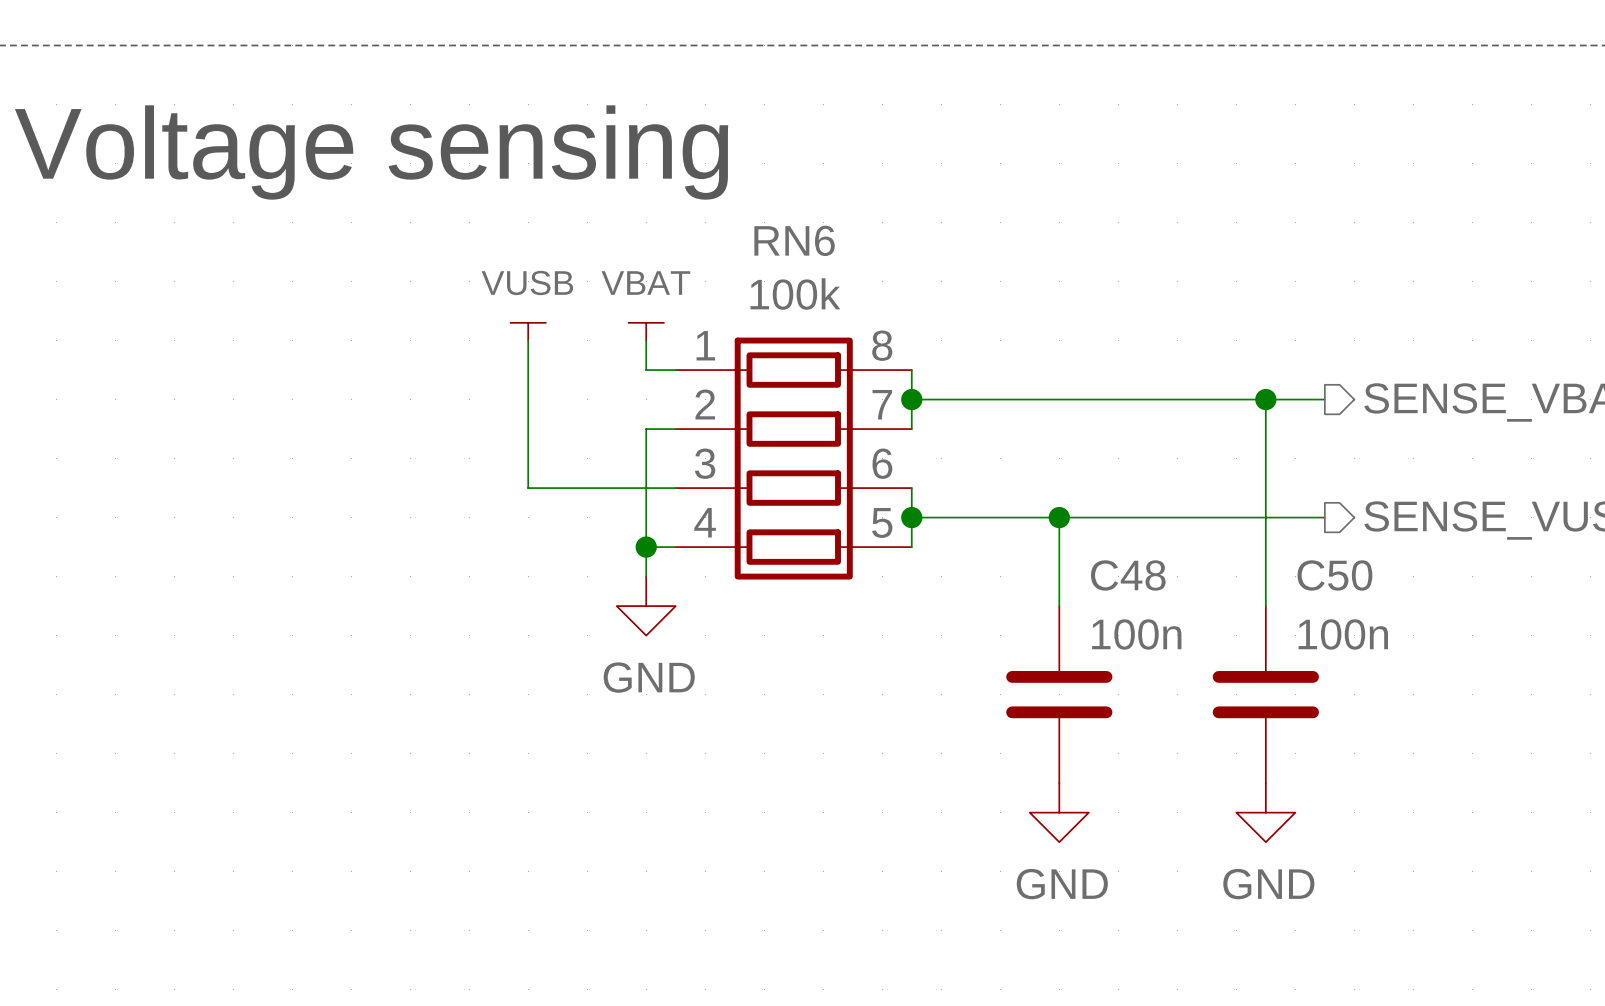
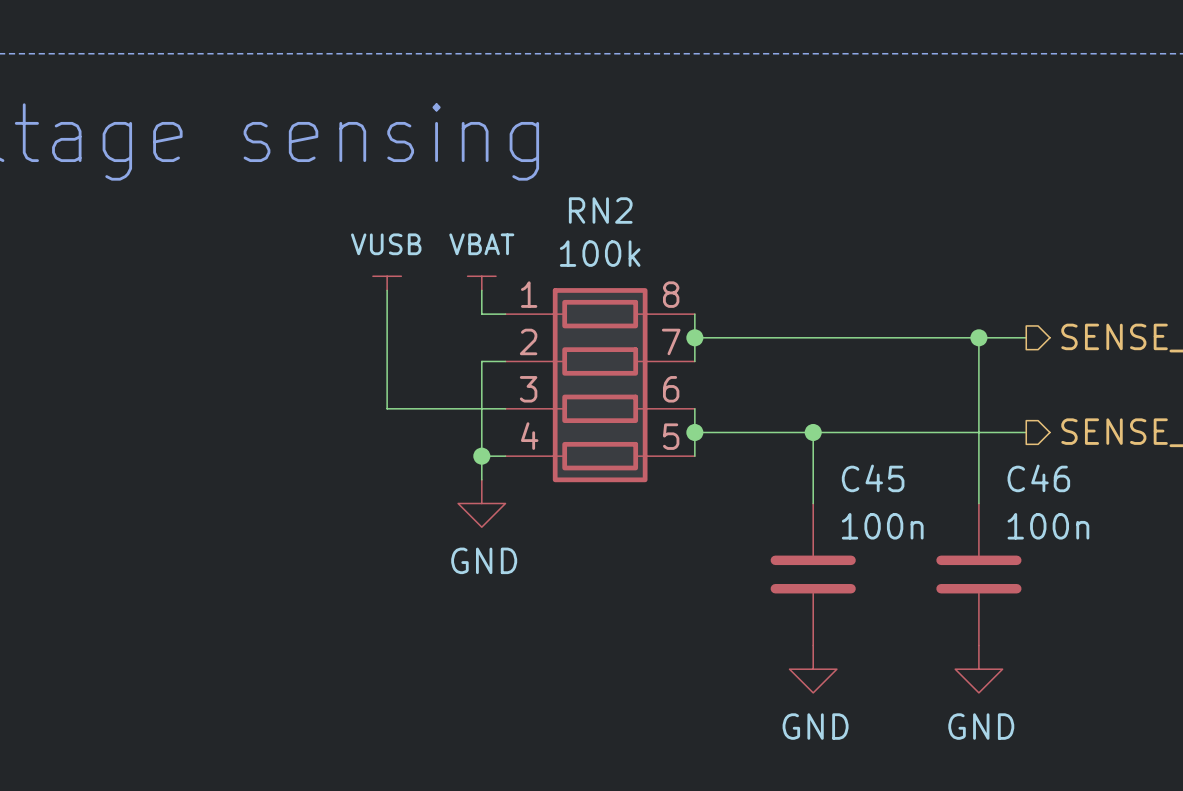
RN6 name: RN6 (794, 240) -> RN2 (600, 210)
C48 name: C48 (1128, 575) -> C45 (873, 478)
C50 name: C50 (1334, 575) -> C46 (1038, 478)

